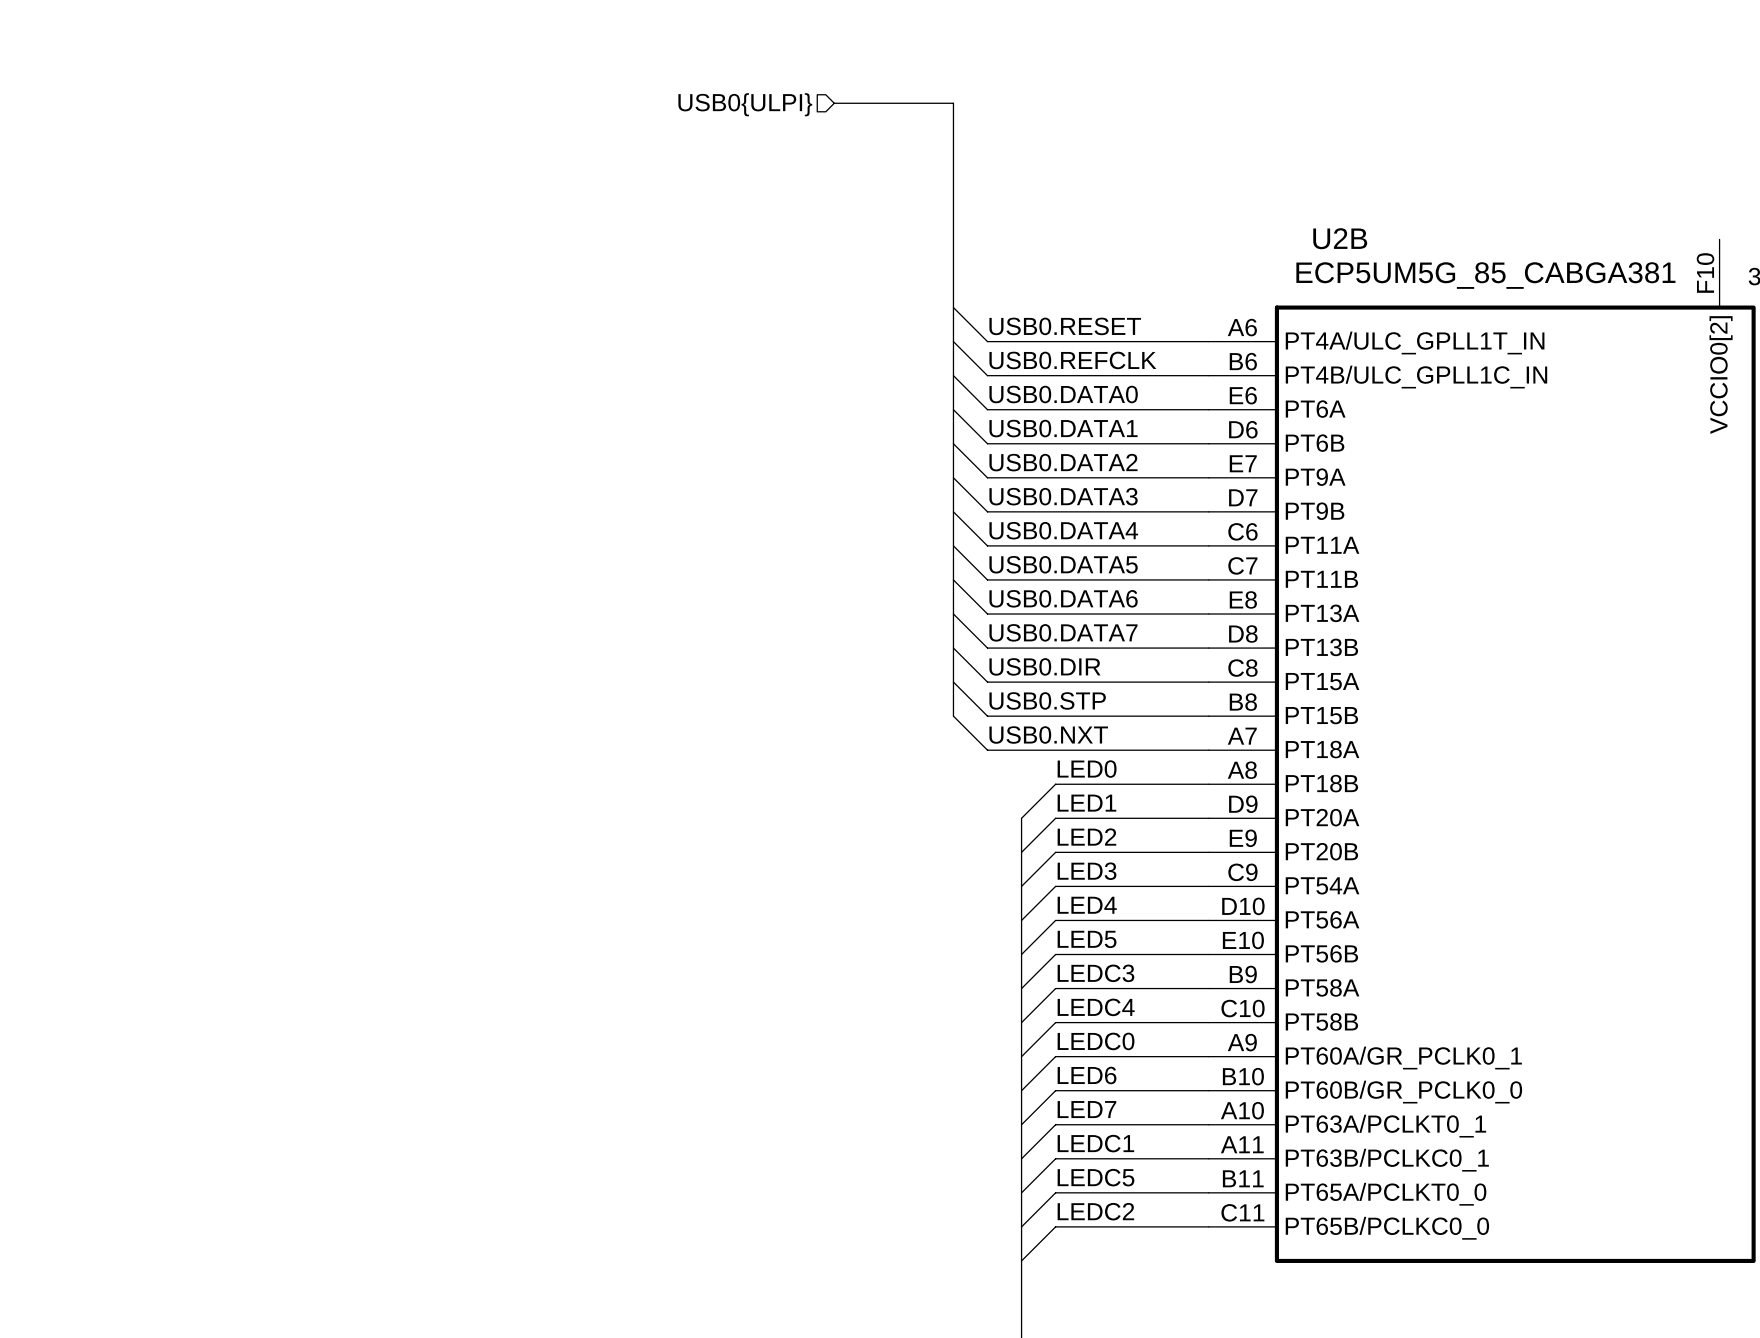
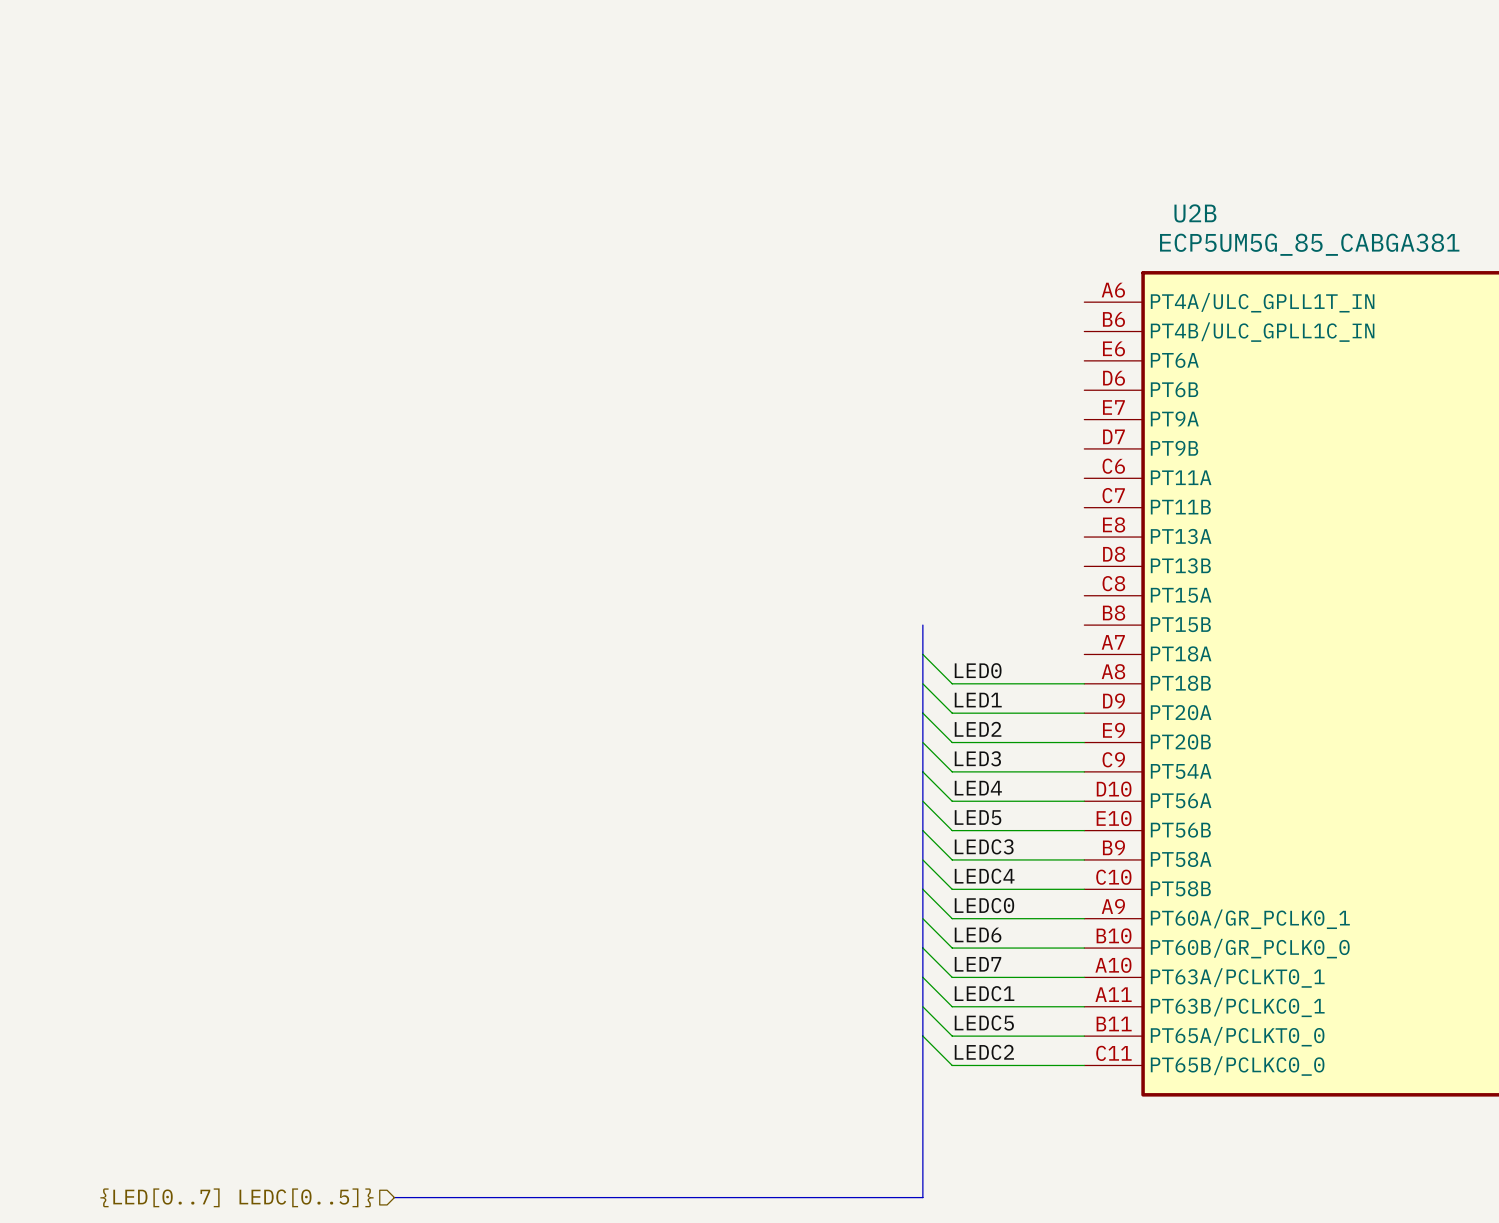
bus: (834, 103) (953, 103) (953, 716) -> none
hierarchical label: USB0{ULPI} (745, 104) -> none
wire: (953, 307) (987, 341) (1208, 341) -> none
label: USB0.RESET (1065, 326) -> none
wire: (953, 341) (987, 375) (1208, 375) -> none
label: USB0.REFCLK (1072, 360) -> none
wire: (953, 375) (987, 409) (1208, 409) -> none
label: USB0.DATA0 (1063, 394) -> none
wire: (953, 409) (987, 443) (1208, 443) -> none
label: USB0.DATA1 (1063, 428) -> none
wire: (953, 443) (987, 477) (1208, 477) -> none
label: USB0.DATA2 (1063, 462) -> none
wire: (953, 477) (987, 511) (1208, 511) -> none
label: USB0.DATA3 (1063, 496) -> none
wire: (953, 511) (987, 545) (1208, 545) -> none
label: USB0.DATA4 (1063, 530) -> none
wire: (953, 545) (987, 579) (1208, 579) -> none
label: USB0.DATA5 (1063, 564) -> none
wire: (953, 579) (987, 614) (1208, 614) -> none
label: USB0.DATA6 (1063, 598) -> none
wire: (953, 614) (987, 648) (1208, 648) -> none
label: USB0.DATA7 (1063, 632) -> none
wire: (953, 648) (987, 682) (1208, 682) -> none
label: USB0.DIR (1044, 666) -> none
wire: (953, 682) (987, 716) (1208, 716) -> none
label: USB0.STP (1047, 700) -> none
wire: (953, 716) (987, 750) (1208, 750) -> none
bus: none -> (922, 625) (922, 713)
label: USB0.NXT (1048, 735) -> none
wire: (1055, 784) (1021, 818) -> (952, 683) (922, 654)
wire: (1055, 818) (1021, 852) -> (952, 713) (922, 683)
wire: (1055, 852) (1021, 886) -> (952, 742) (922, 713)
wire: (1055, 886) (1021, 920) -> (952, 771) (922, 742)
wire: none -> (922, 801) (952, 830)
wire: (1055, 920) (1021, 954) -> (952, 801) (922, 771)
wire: (1055, 954) (1021, 988) -> (952, 889) (922, 859)
wire: (1055, 988) (1021, 1022) -> (952, 859) (922, 830)
wire: (1055, 1022) (1021, 1056) -> (952, 948) (922, 918)
wire: (1055, 1056) (1021, 1090) -> (952, 918) (922, 889)
wire: (1055, 1090) (1021, 1124) -> (952, 1006) (922, 977)
wire: (1055, 1124) (1021, 1158) -> (952, 977) (922, 948)
wire: (1055, 1158) (1021, 1192) -> none
wire: (1055, 1192) (1021, 1226) -> (952, 1036) (922, 1006)
wire: (1055, 1226) (1021, 1260) -> (952, 1065) (922, 1036)

